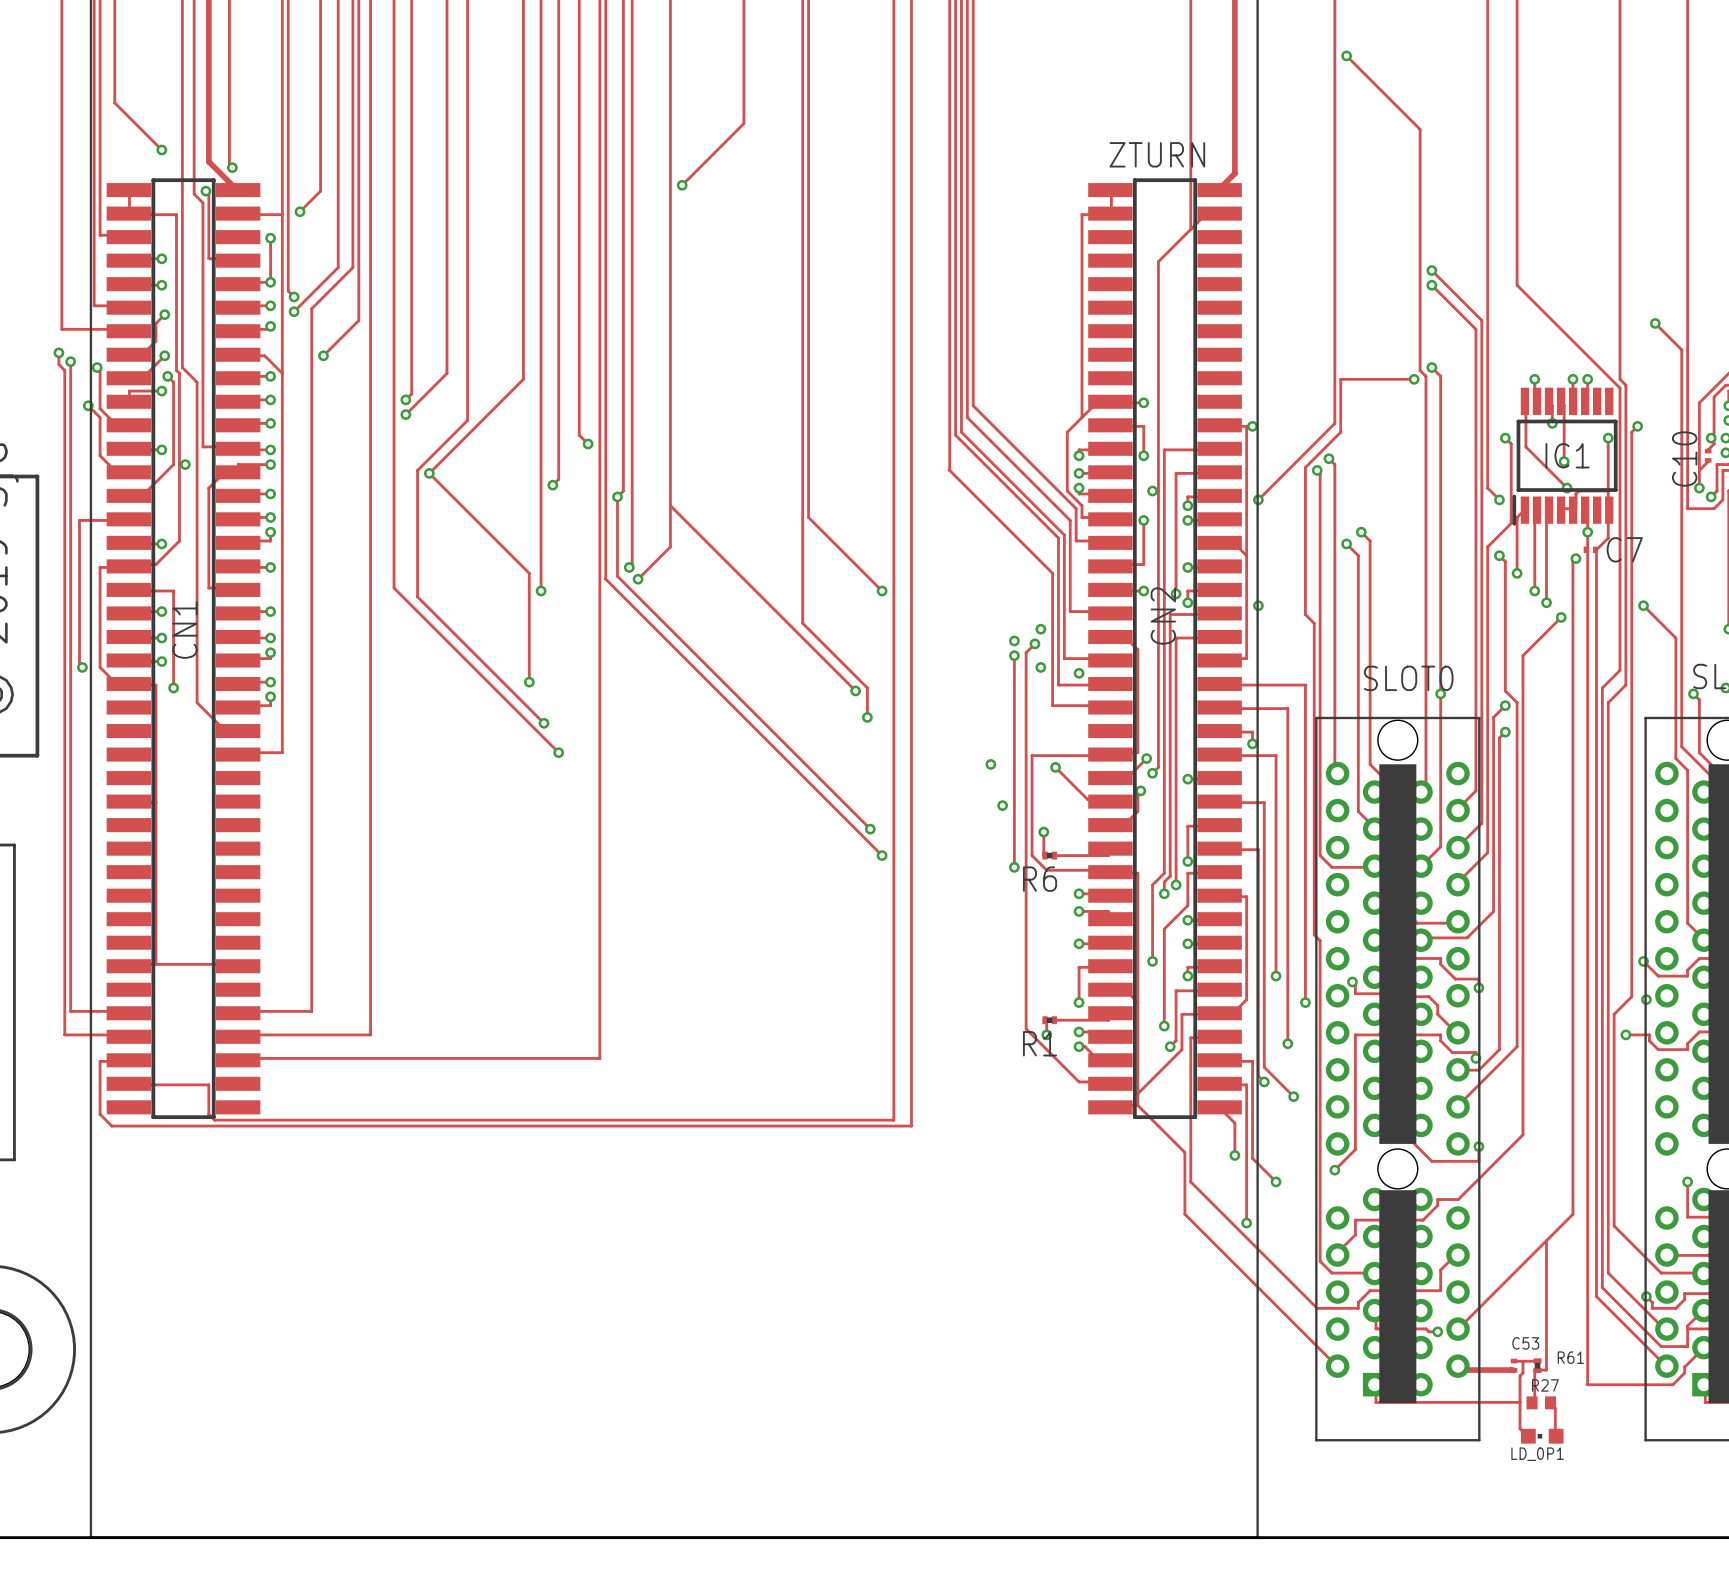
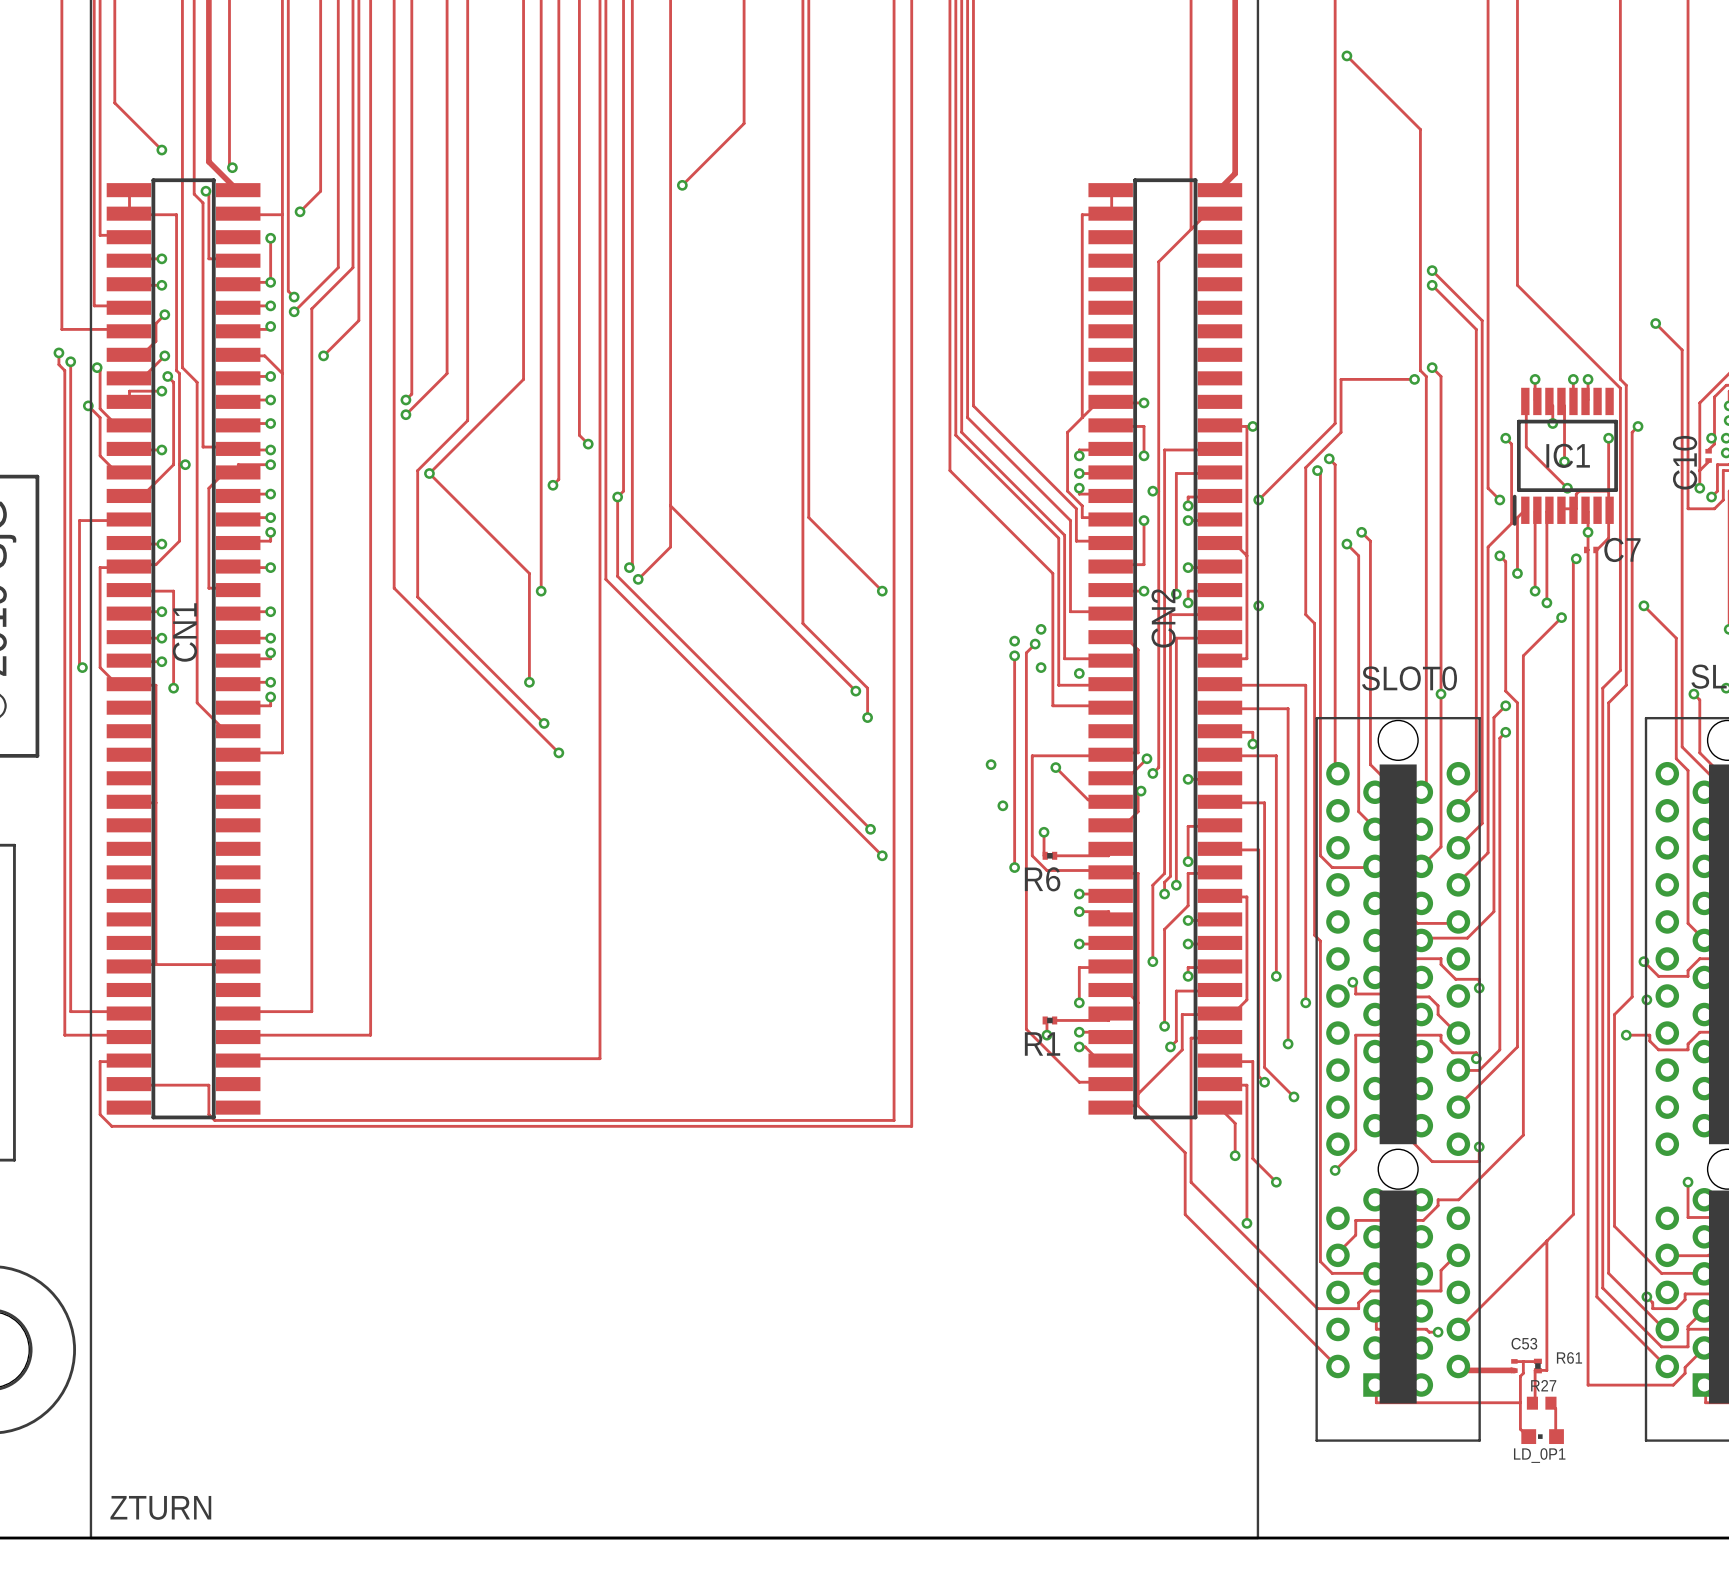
ZTURN name position: ZTURN (1157, 154) -> ZTURN (160, 1507)

